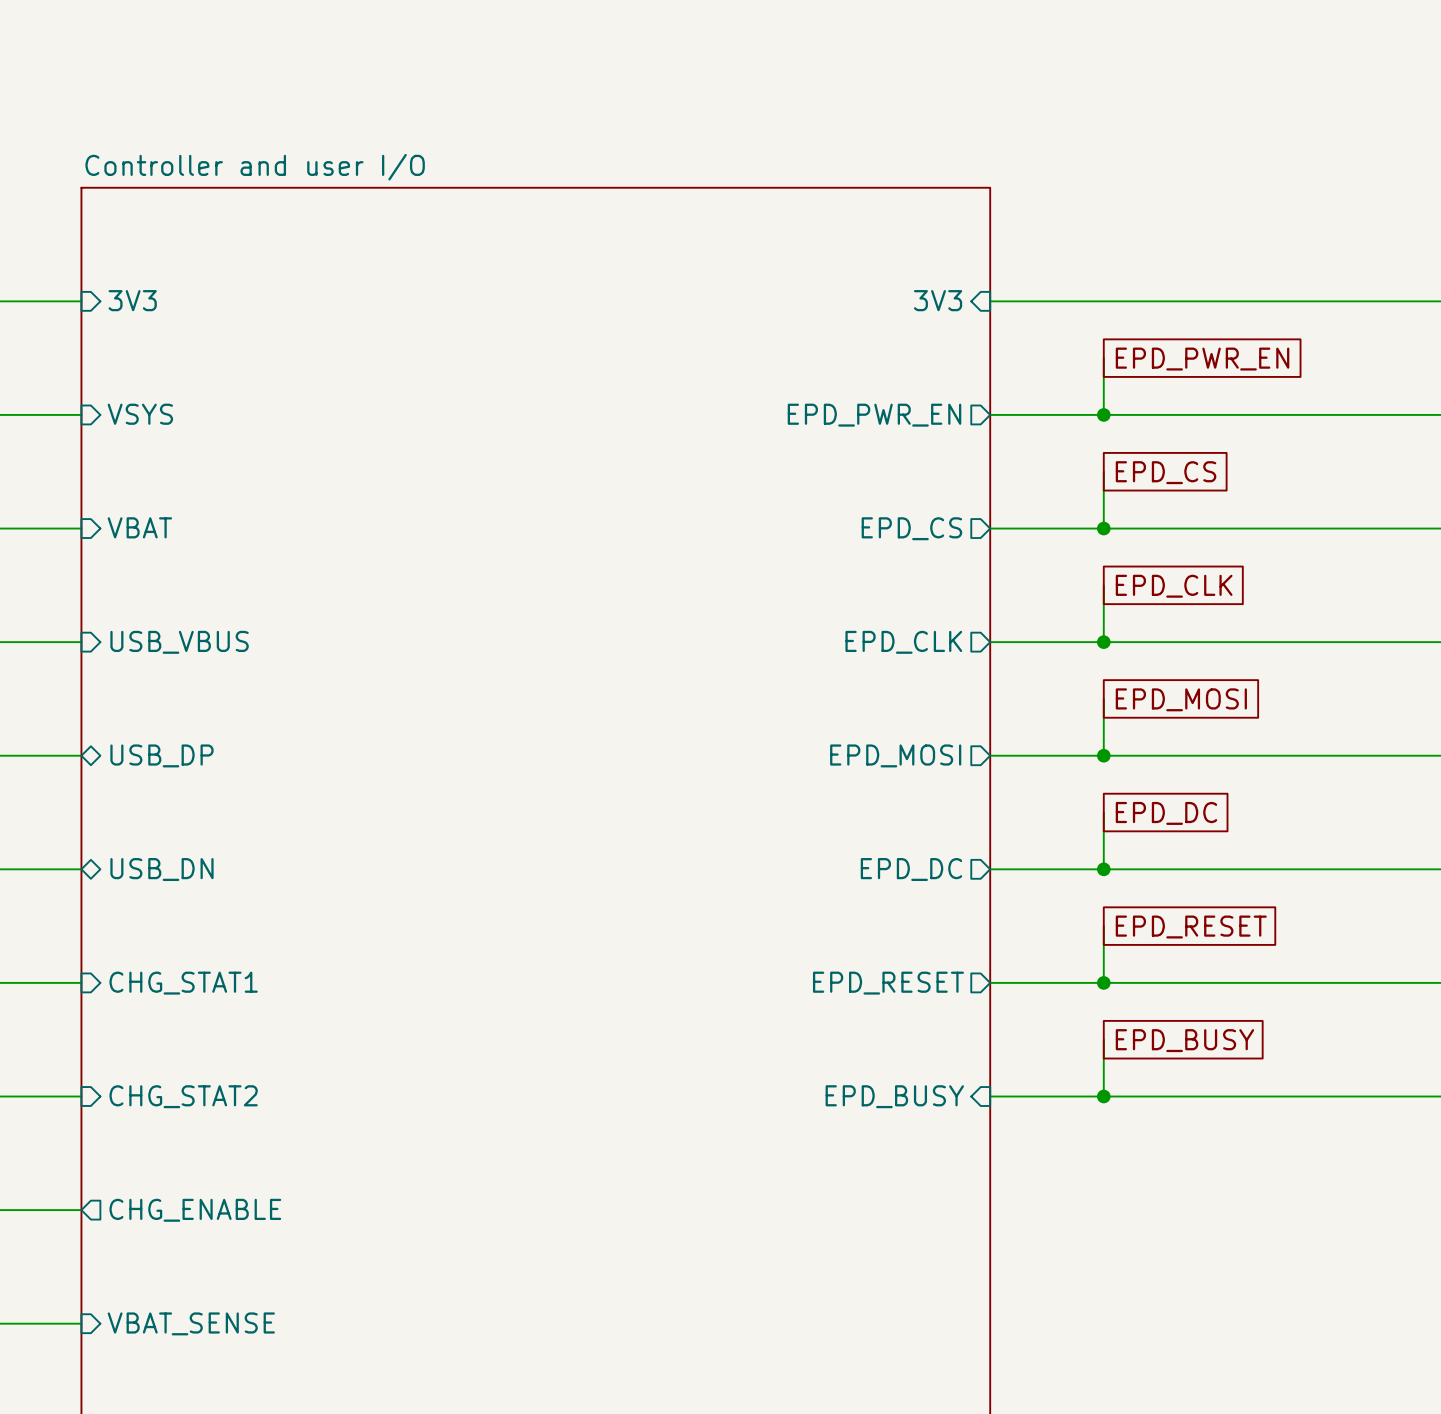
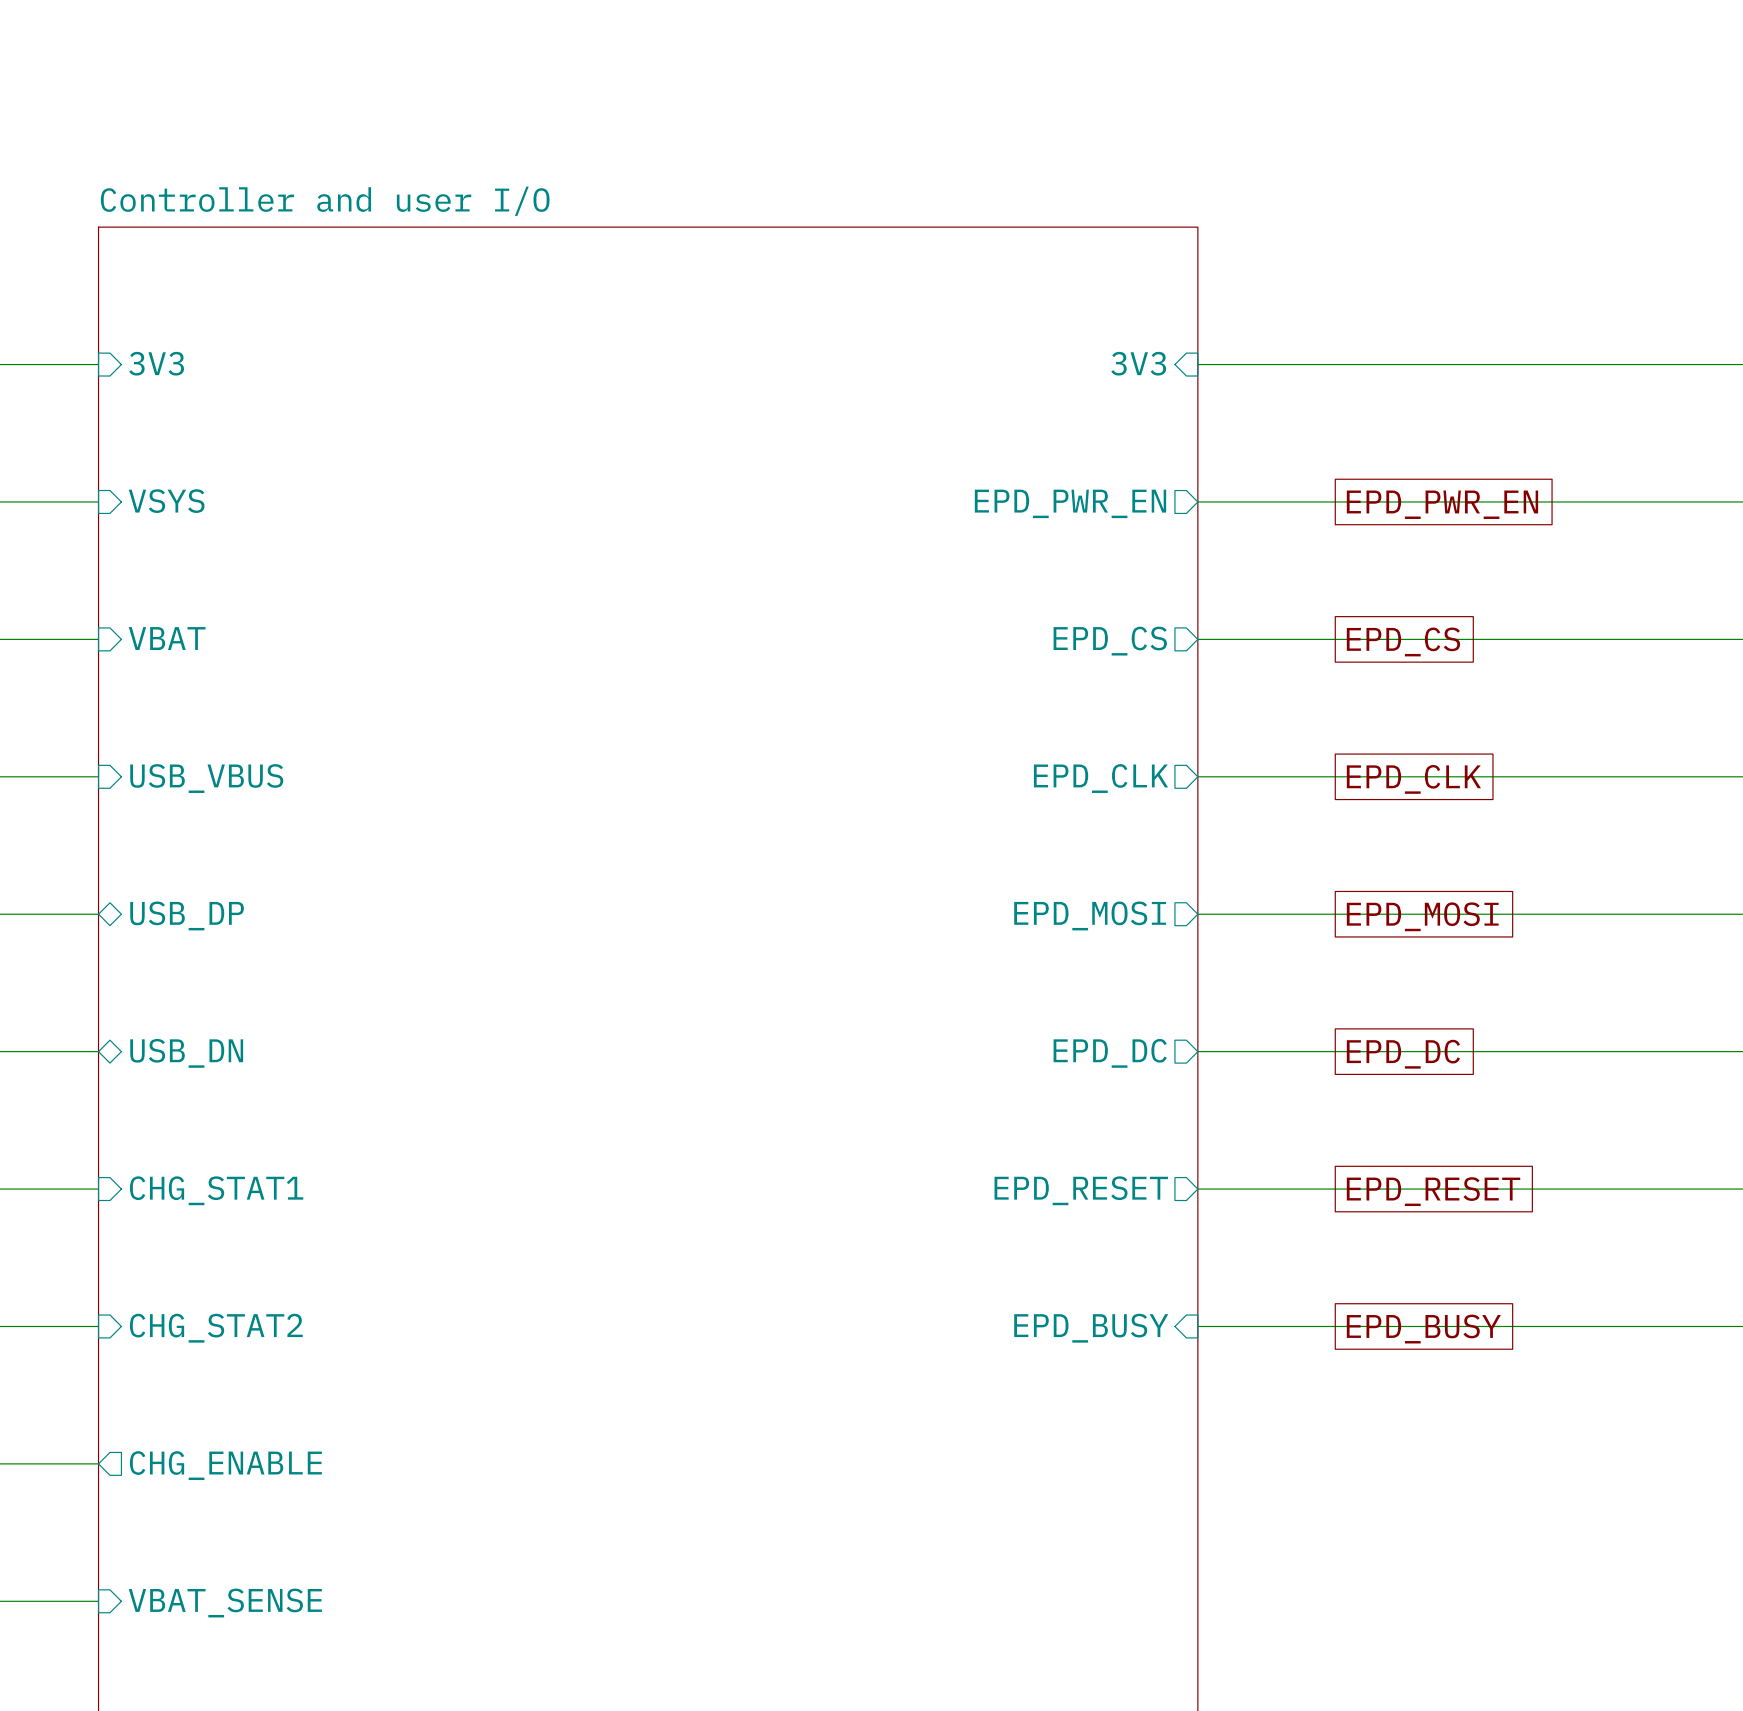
wire: (1103, 358) (1103, 414) -> none
global label position: EPD_PWR_EN (1202, 359) -> EPD_PWR_EN (1442, 504)
junction: (1103, 414) -> none
wire: (1103, 471) (1103, 528) -> none
global label position: EPD_CS (1166, 472) -> EPD_CS (1403, 641)
junction: (1103, 528) -> none
wire: (1103, 585) (1103, 642) -> none
global label position: EPD_CLK (1174, 586) -> EPD_CLK (1413, 779)
junction: (1103, 642) -> none
wire: (1103, 698) (1103, 755) -> none
global label position: EPD_MOSI (1181, 699) -> EPD_MOSI (1422, 916)
junction: (1103, 755) -> none
wire: (1103, 812) (1103, 869) -> none
global label position: EPD_DC (1166, 813) -> EPD_DC (1403, 1054)
junction: (1103, 869) -> none
wire: (1103, 926) (1103, 982) -> none
global label position: EPD_RESET (1191, 927) -> EPD_RESET (1433, 1191)
junction: (1103, 982) -> none
wire: (1103, 1039) (1103, 1096) -> none
global label position: EPD_BUSY (1184, 1040) -> EPD_BUSY (1423, 1329)
junction: (1103, 1096) -> none

